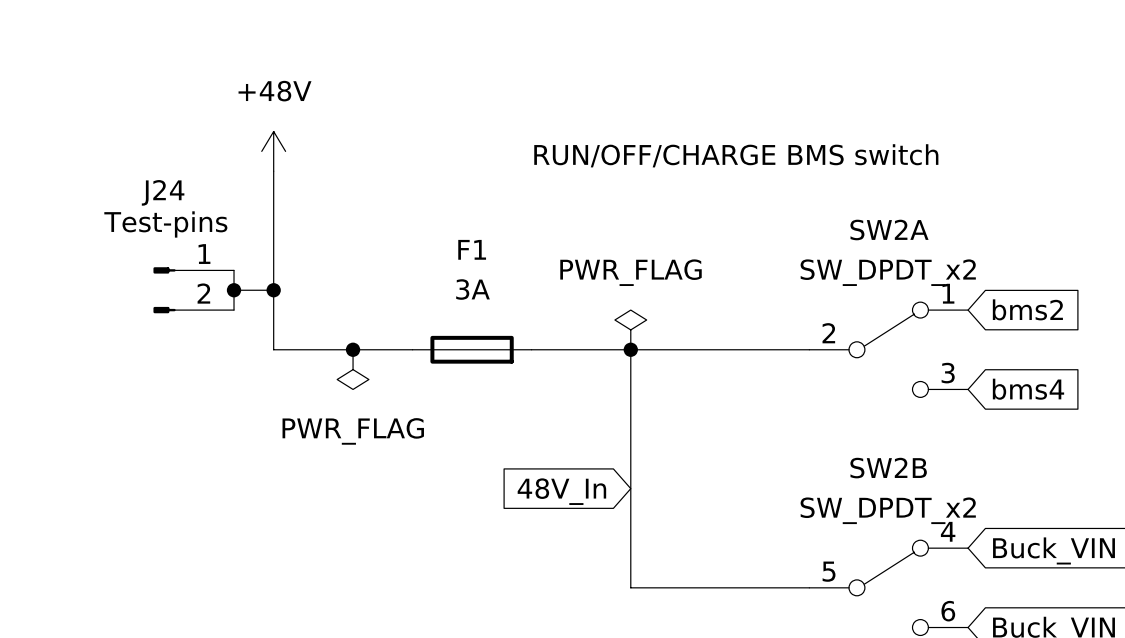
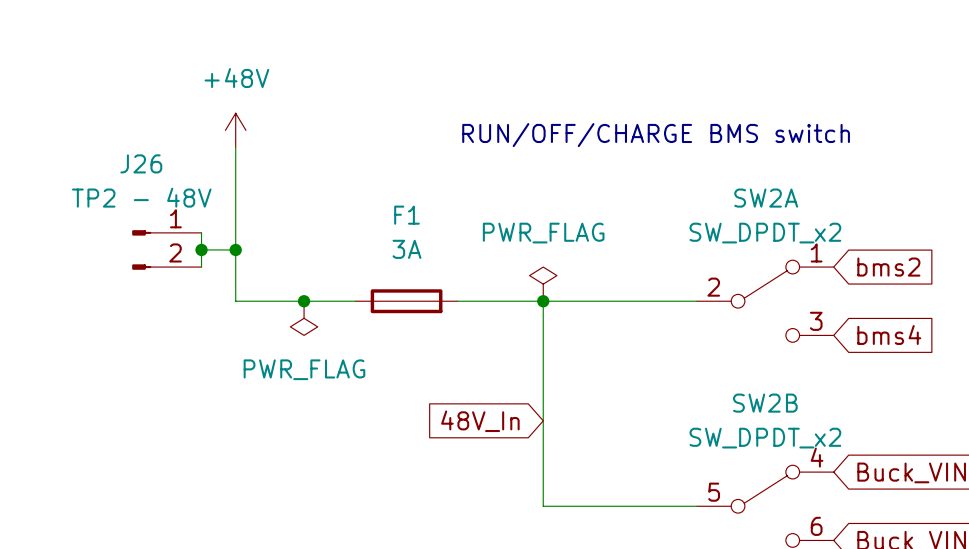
J24 name: J24 (163, 192) -> J26 (141, 163)
J24 value: Test-pins (165, 224) -> TP2 - 48V (141, 197)

